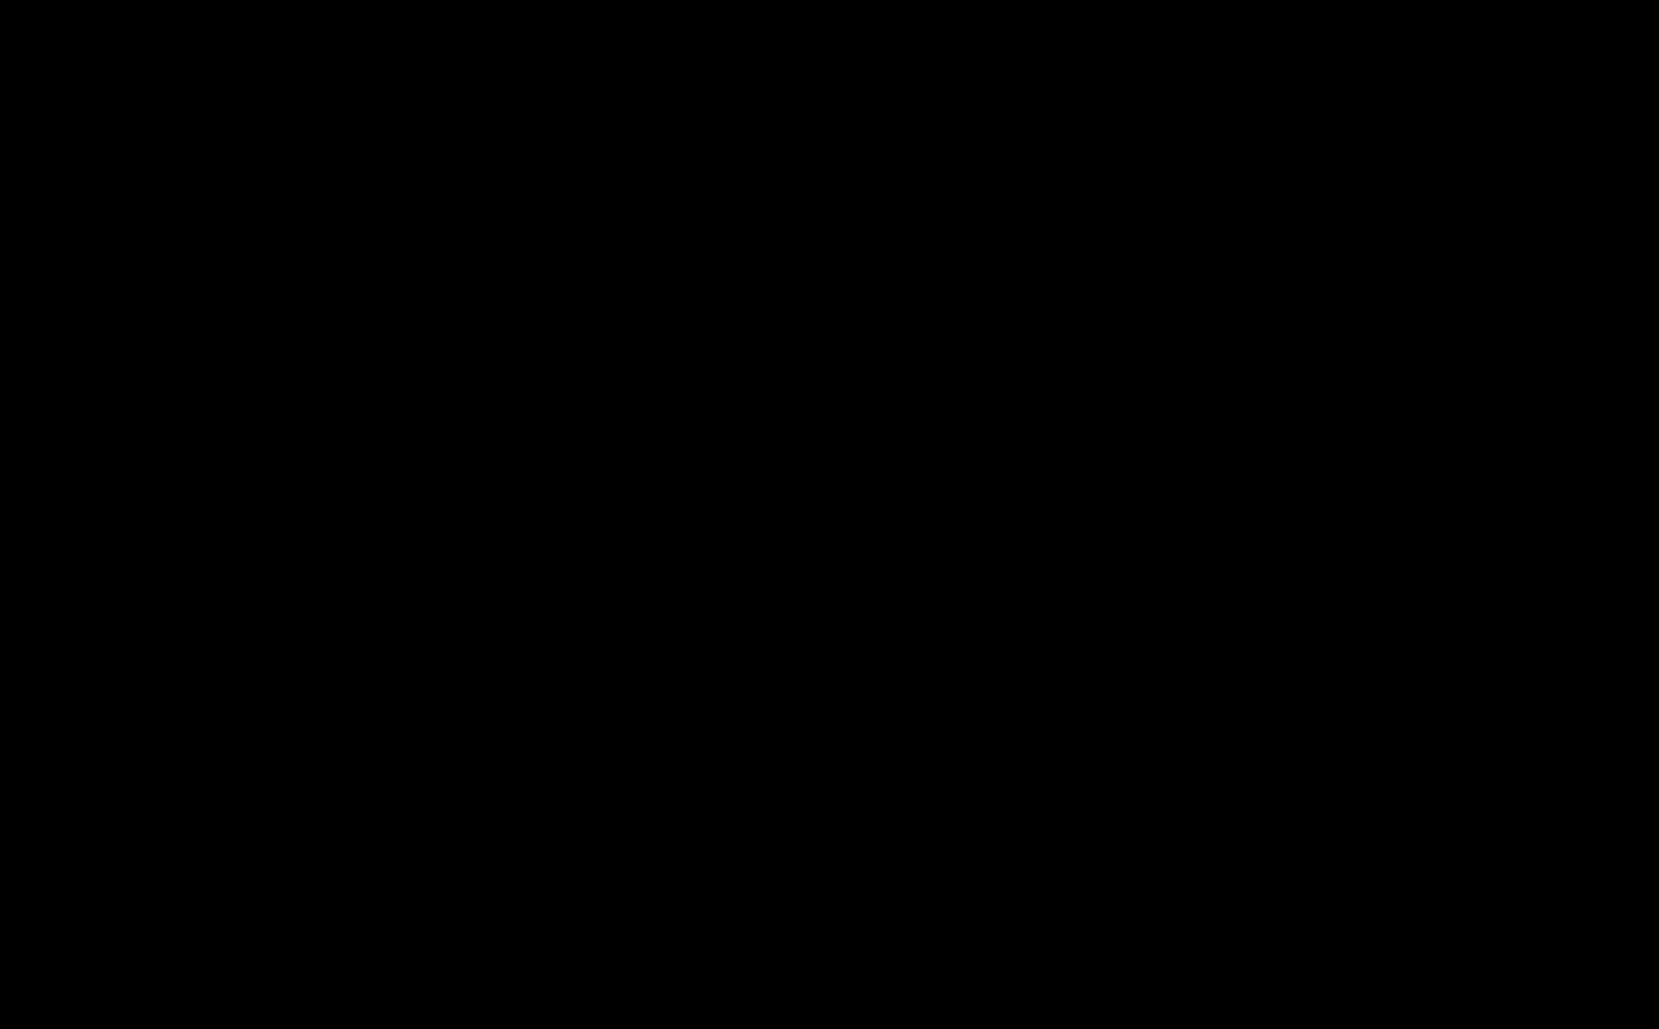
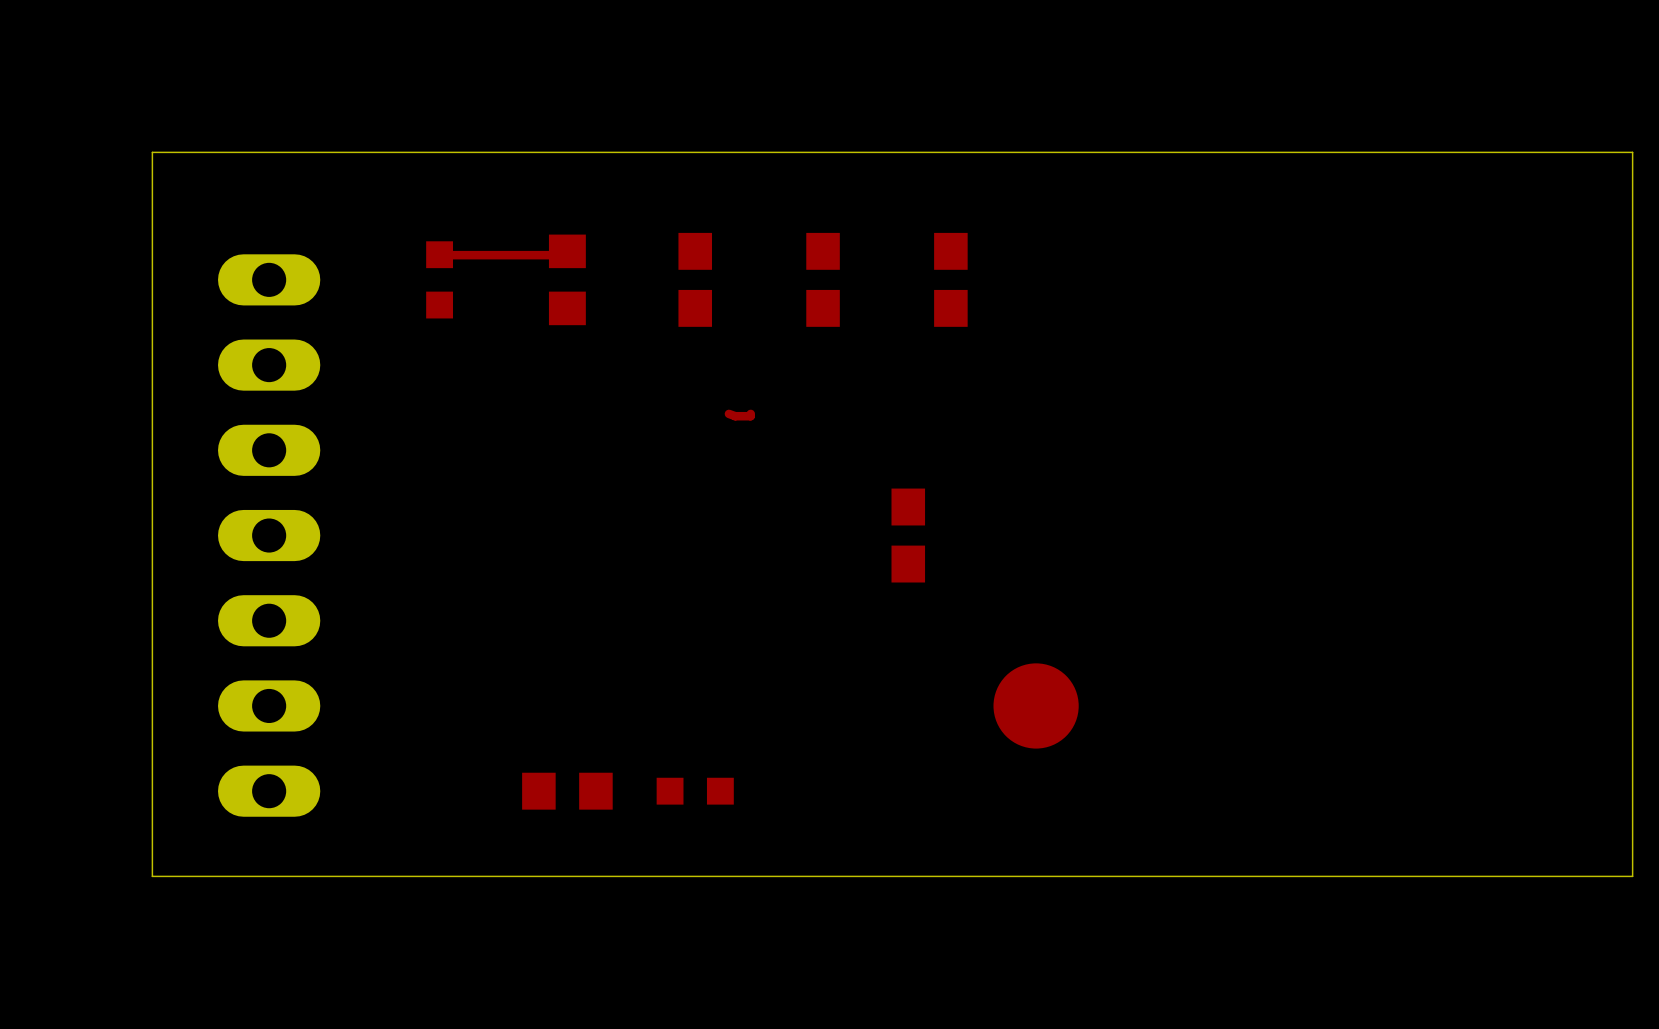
board edge: none -> (1632, 152) (152, 152) (152, 876) (1632, 876) (1632, 152)
top track: none -> (567, 251) (566, 255) (439, 254)
part: none -> (439, 279)
part: none -> (567, 279)
part: none -> (695, 279)
part: none -> (823, 279)
part: none -> (950, 279)
top track: none -> (750, 413) (750, 416) (735, 416) (728, 413)
part: none -> (269, 535)
part: none -> (908, 535)
part: none -> (1036, 705)
part: none -> (567, 791)
part: none -> (695, 791)

